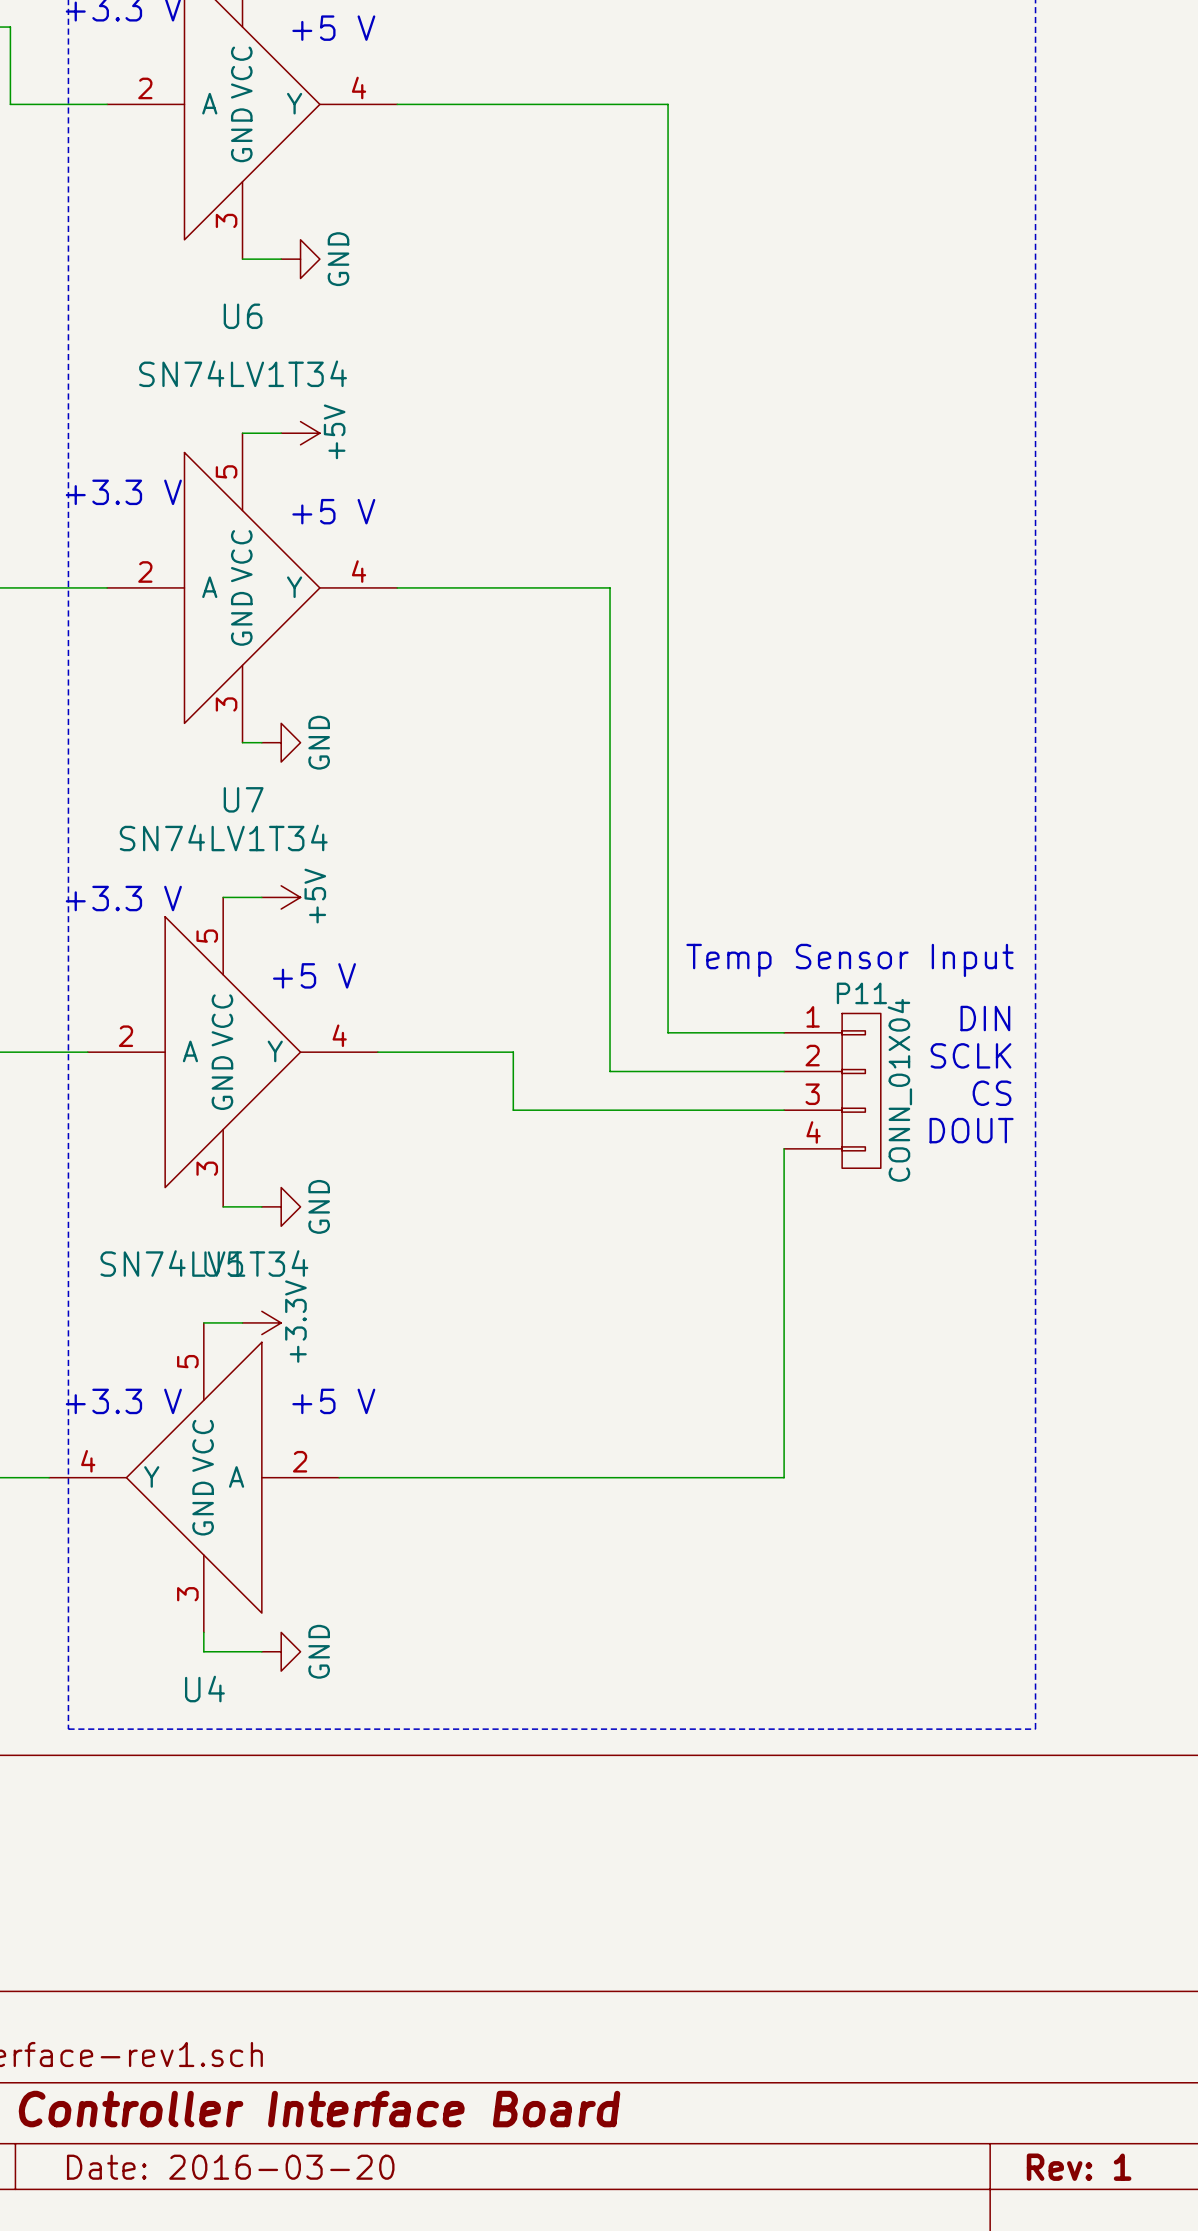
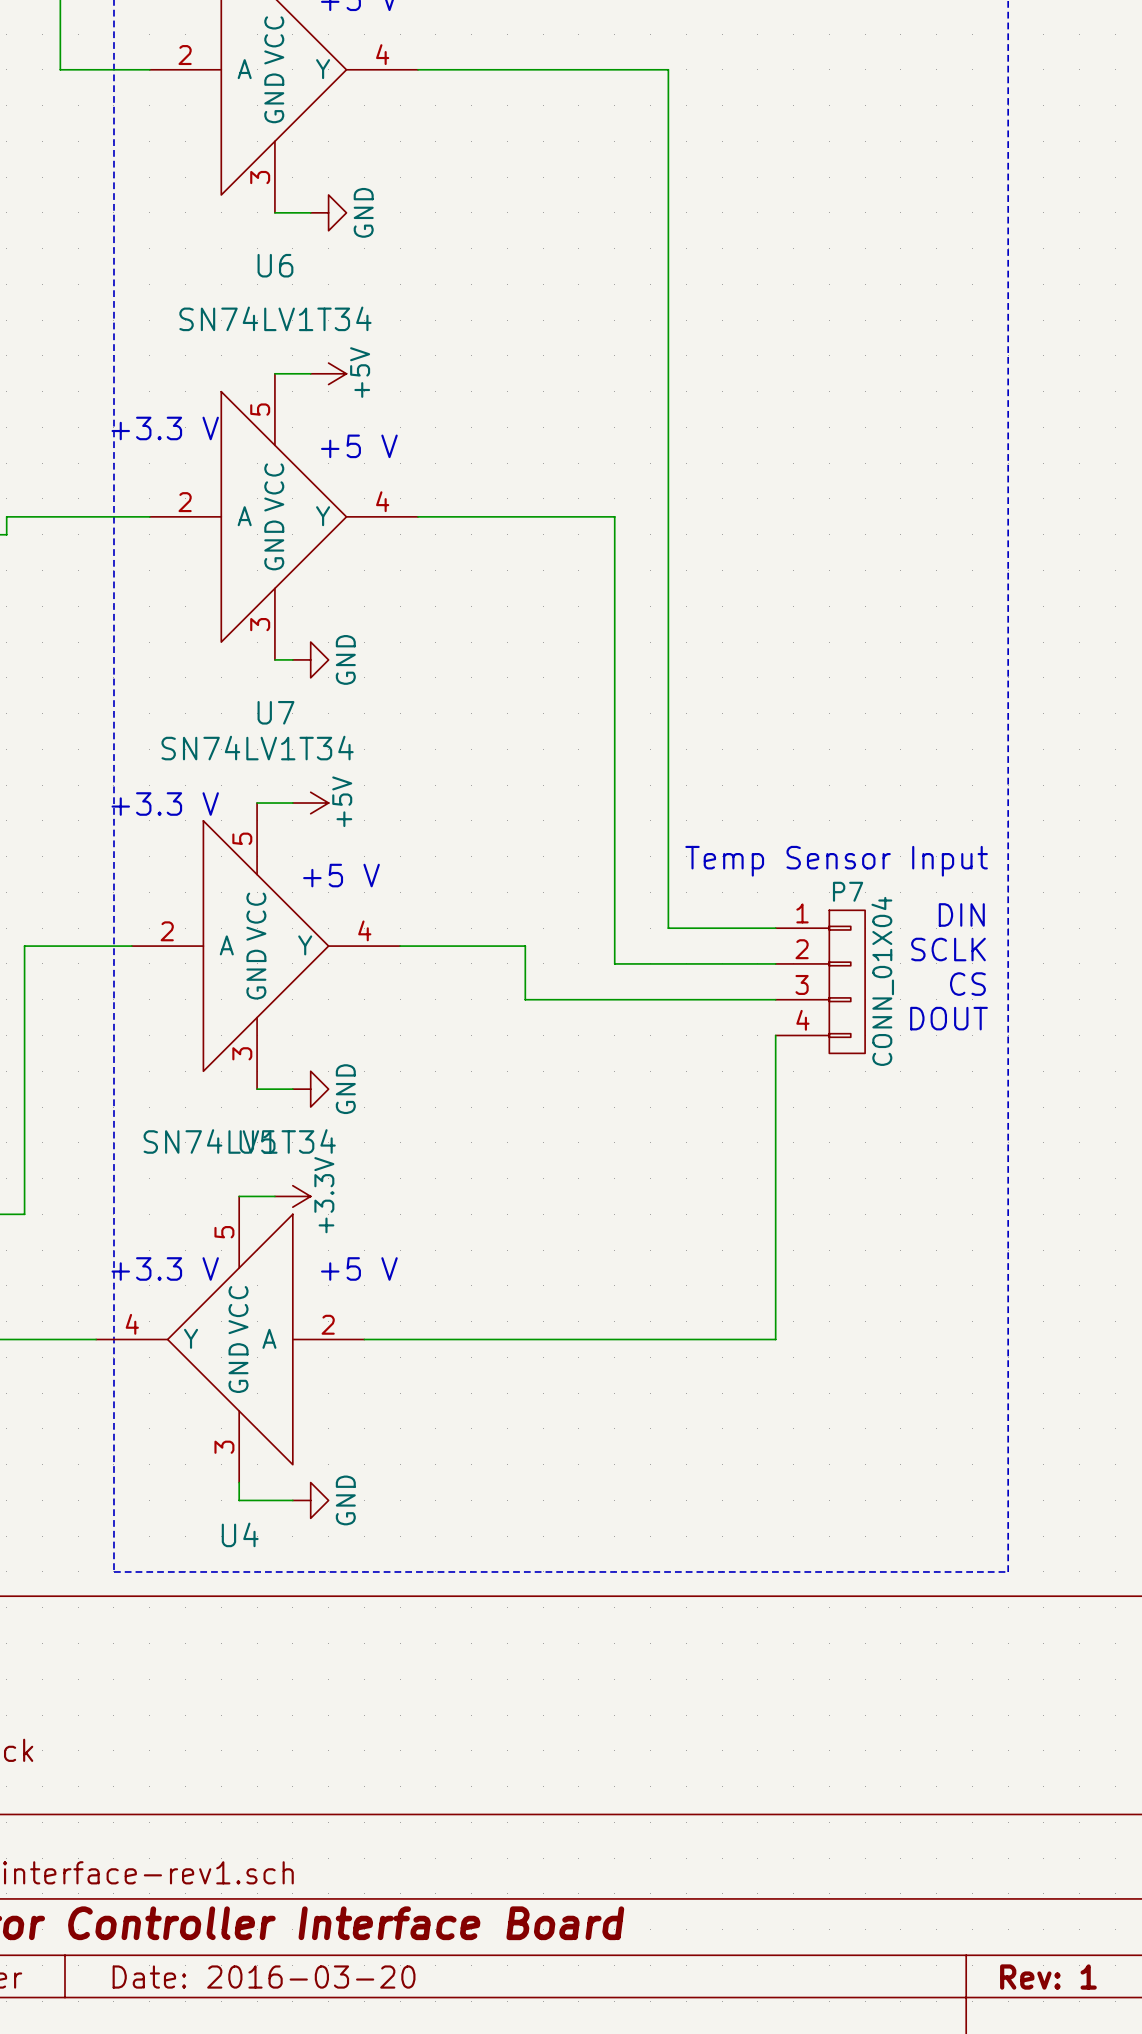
P11 name: P11 (861, 993) -> P7 (848, 891)

